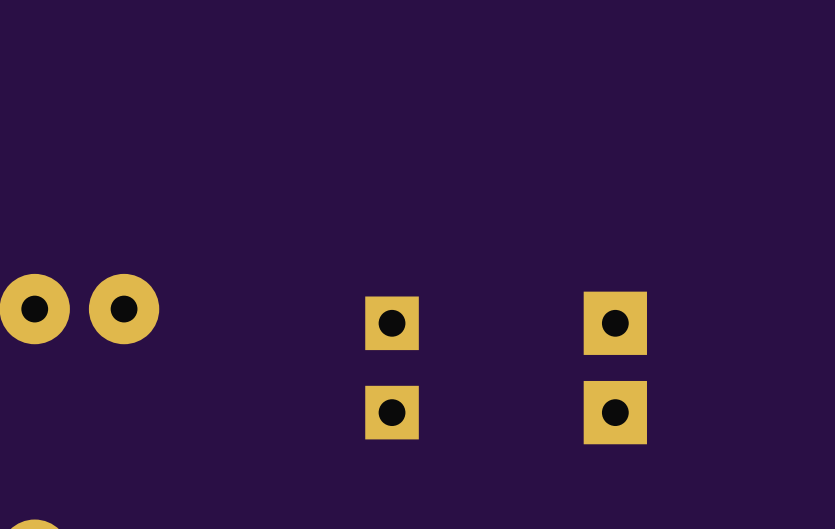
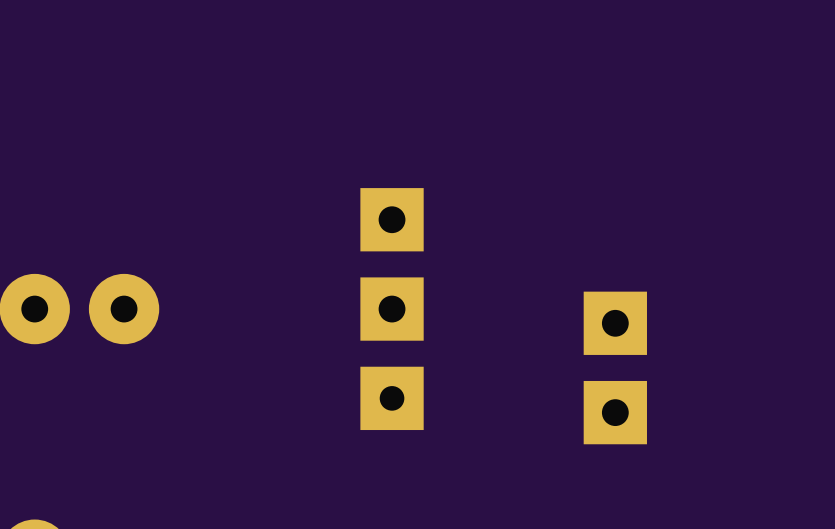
part: none -> (392, 309)
part: (392, 367) -> none

